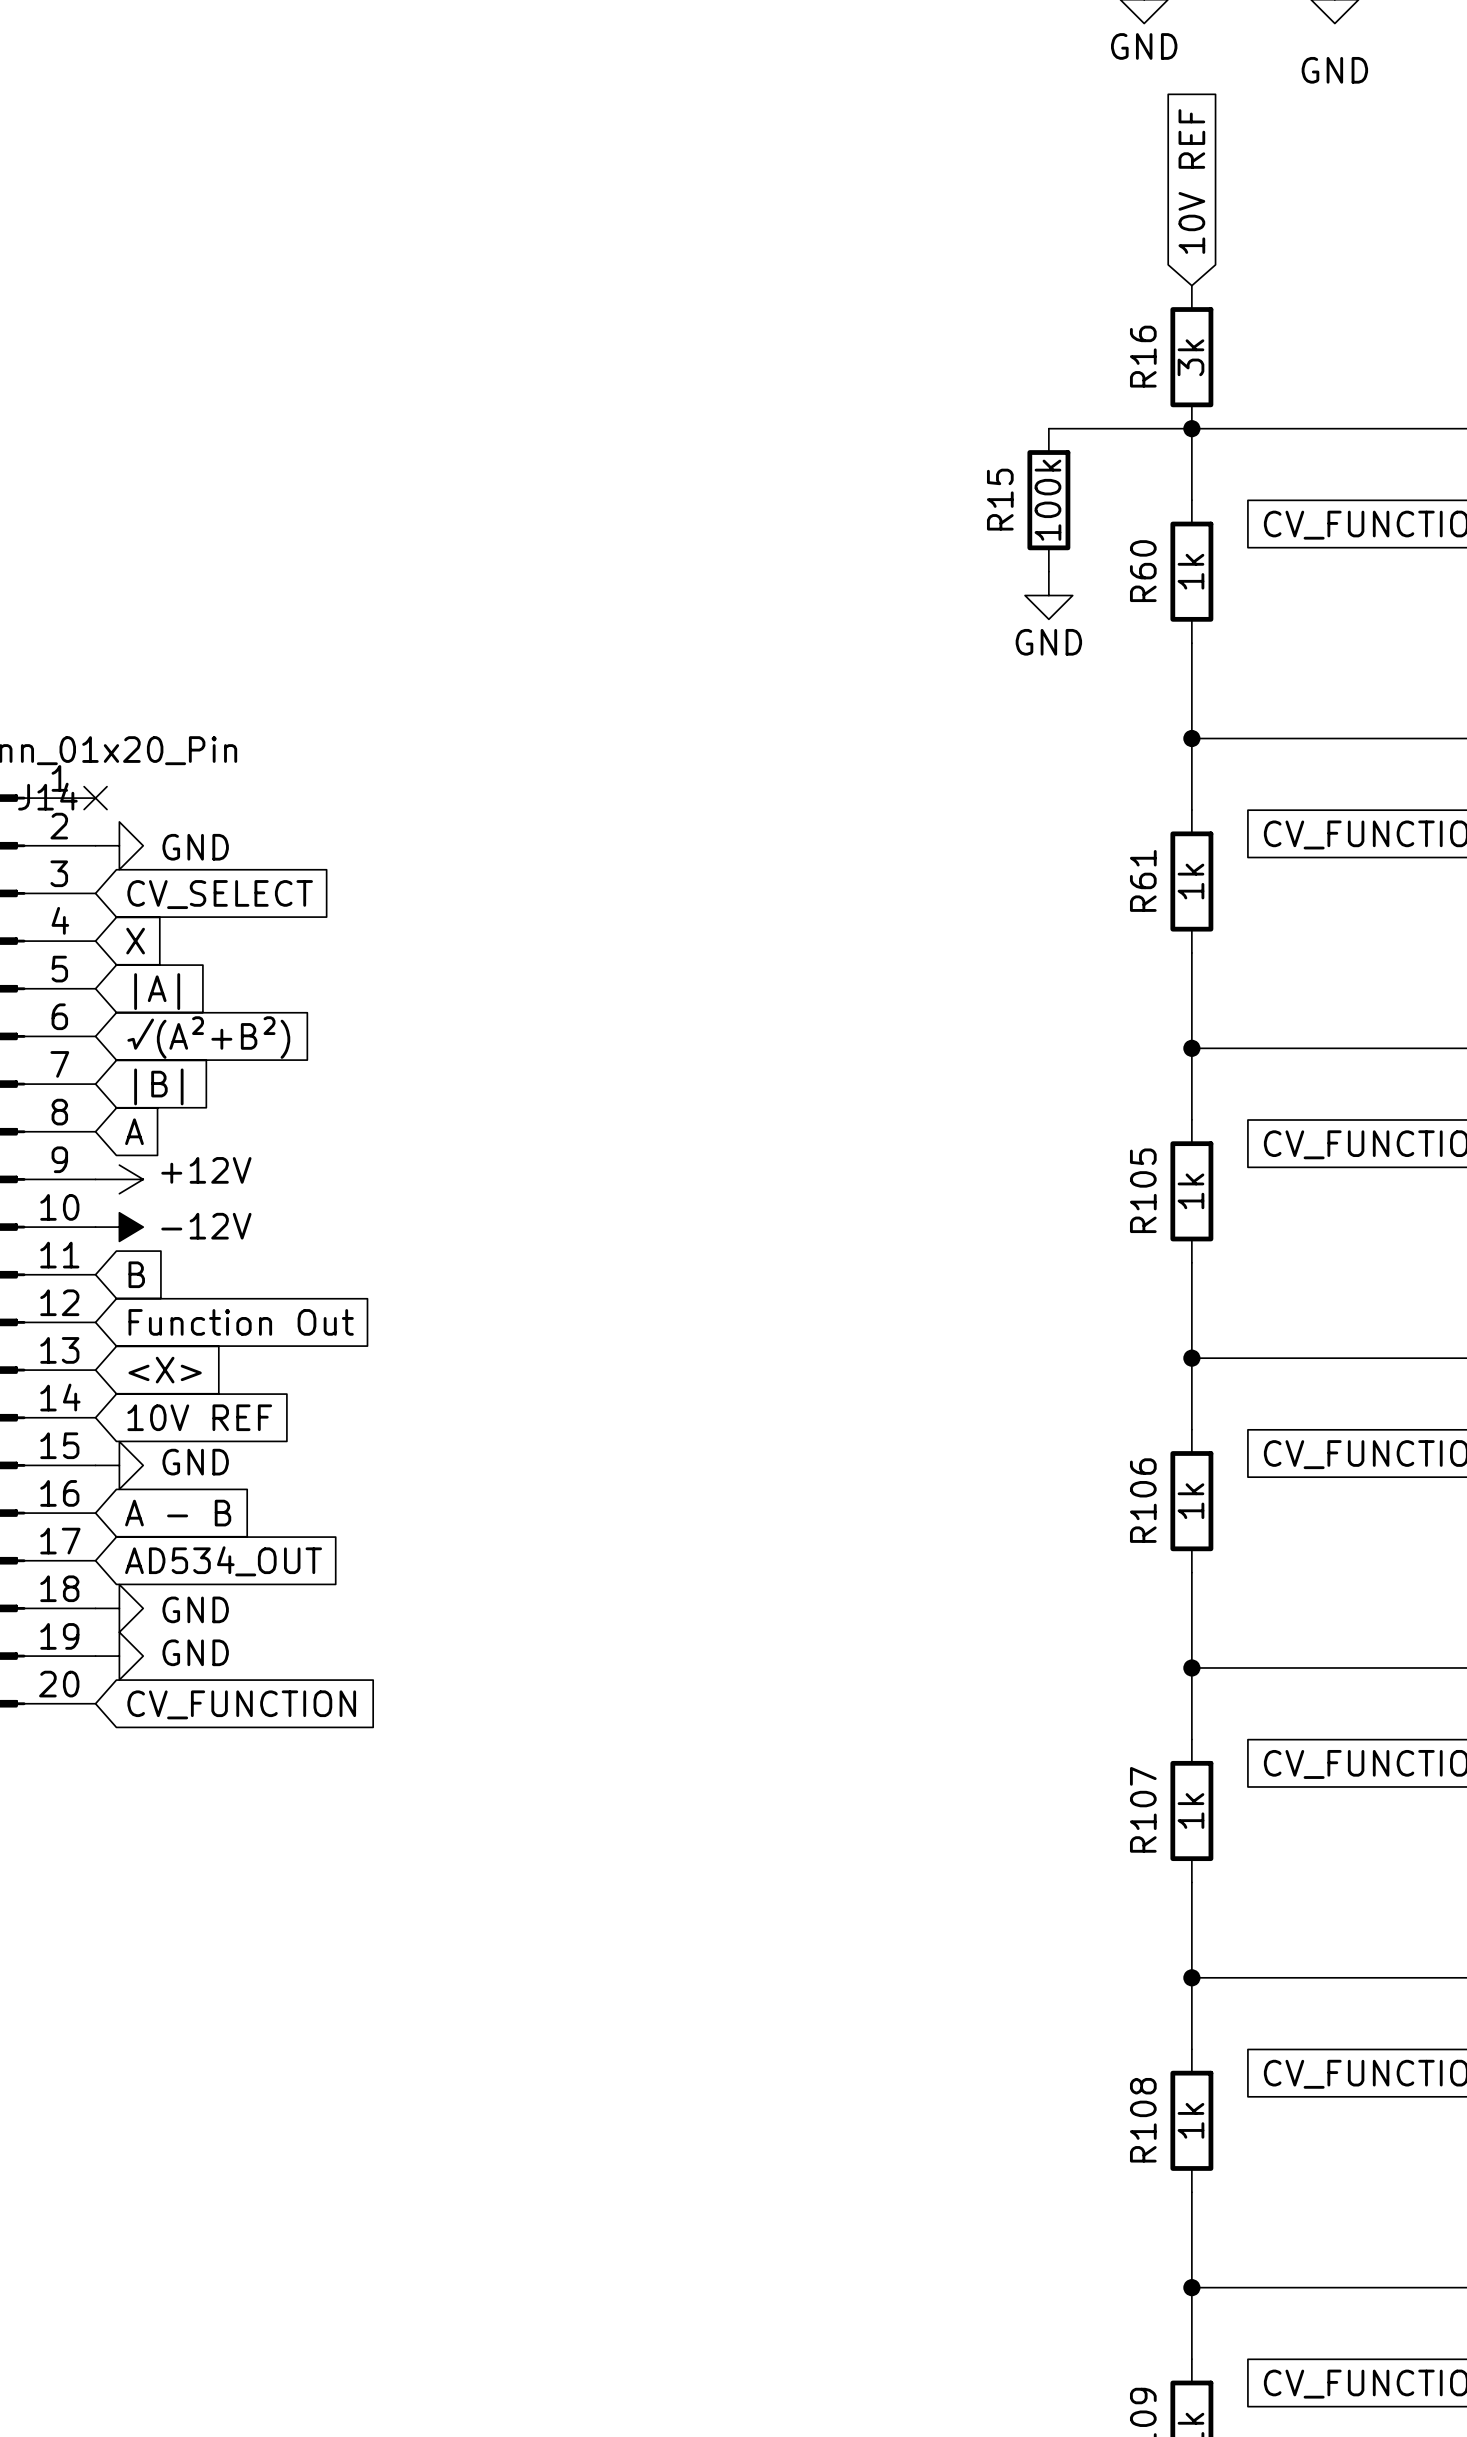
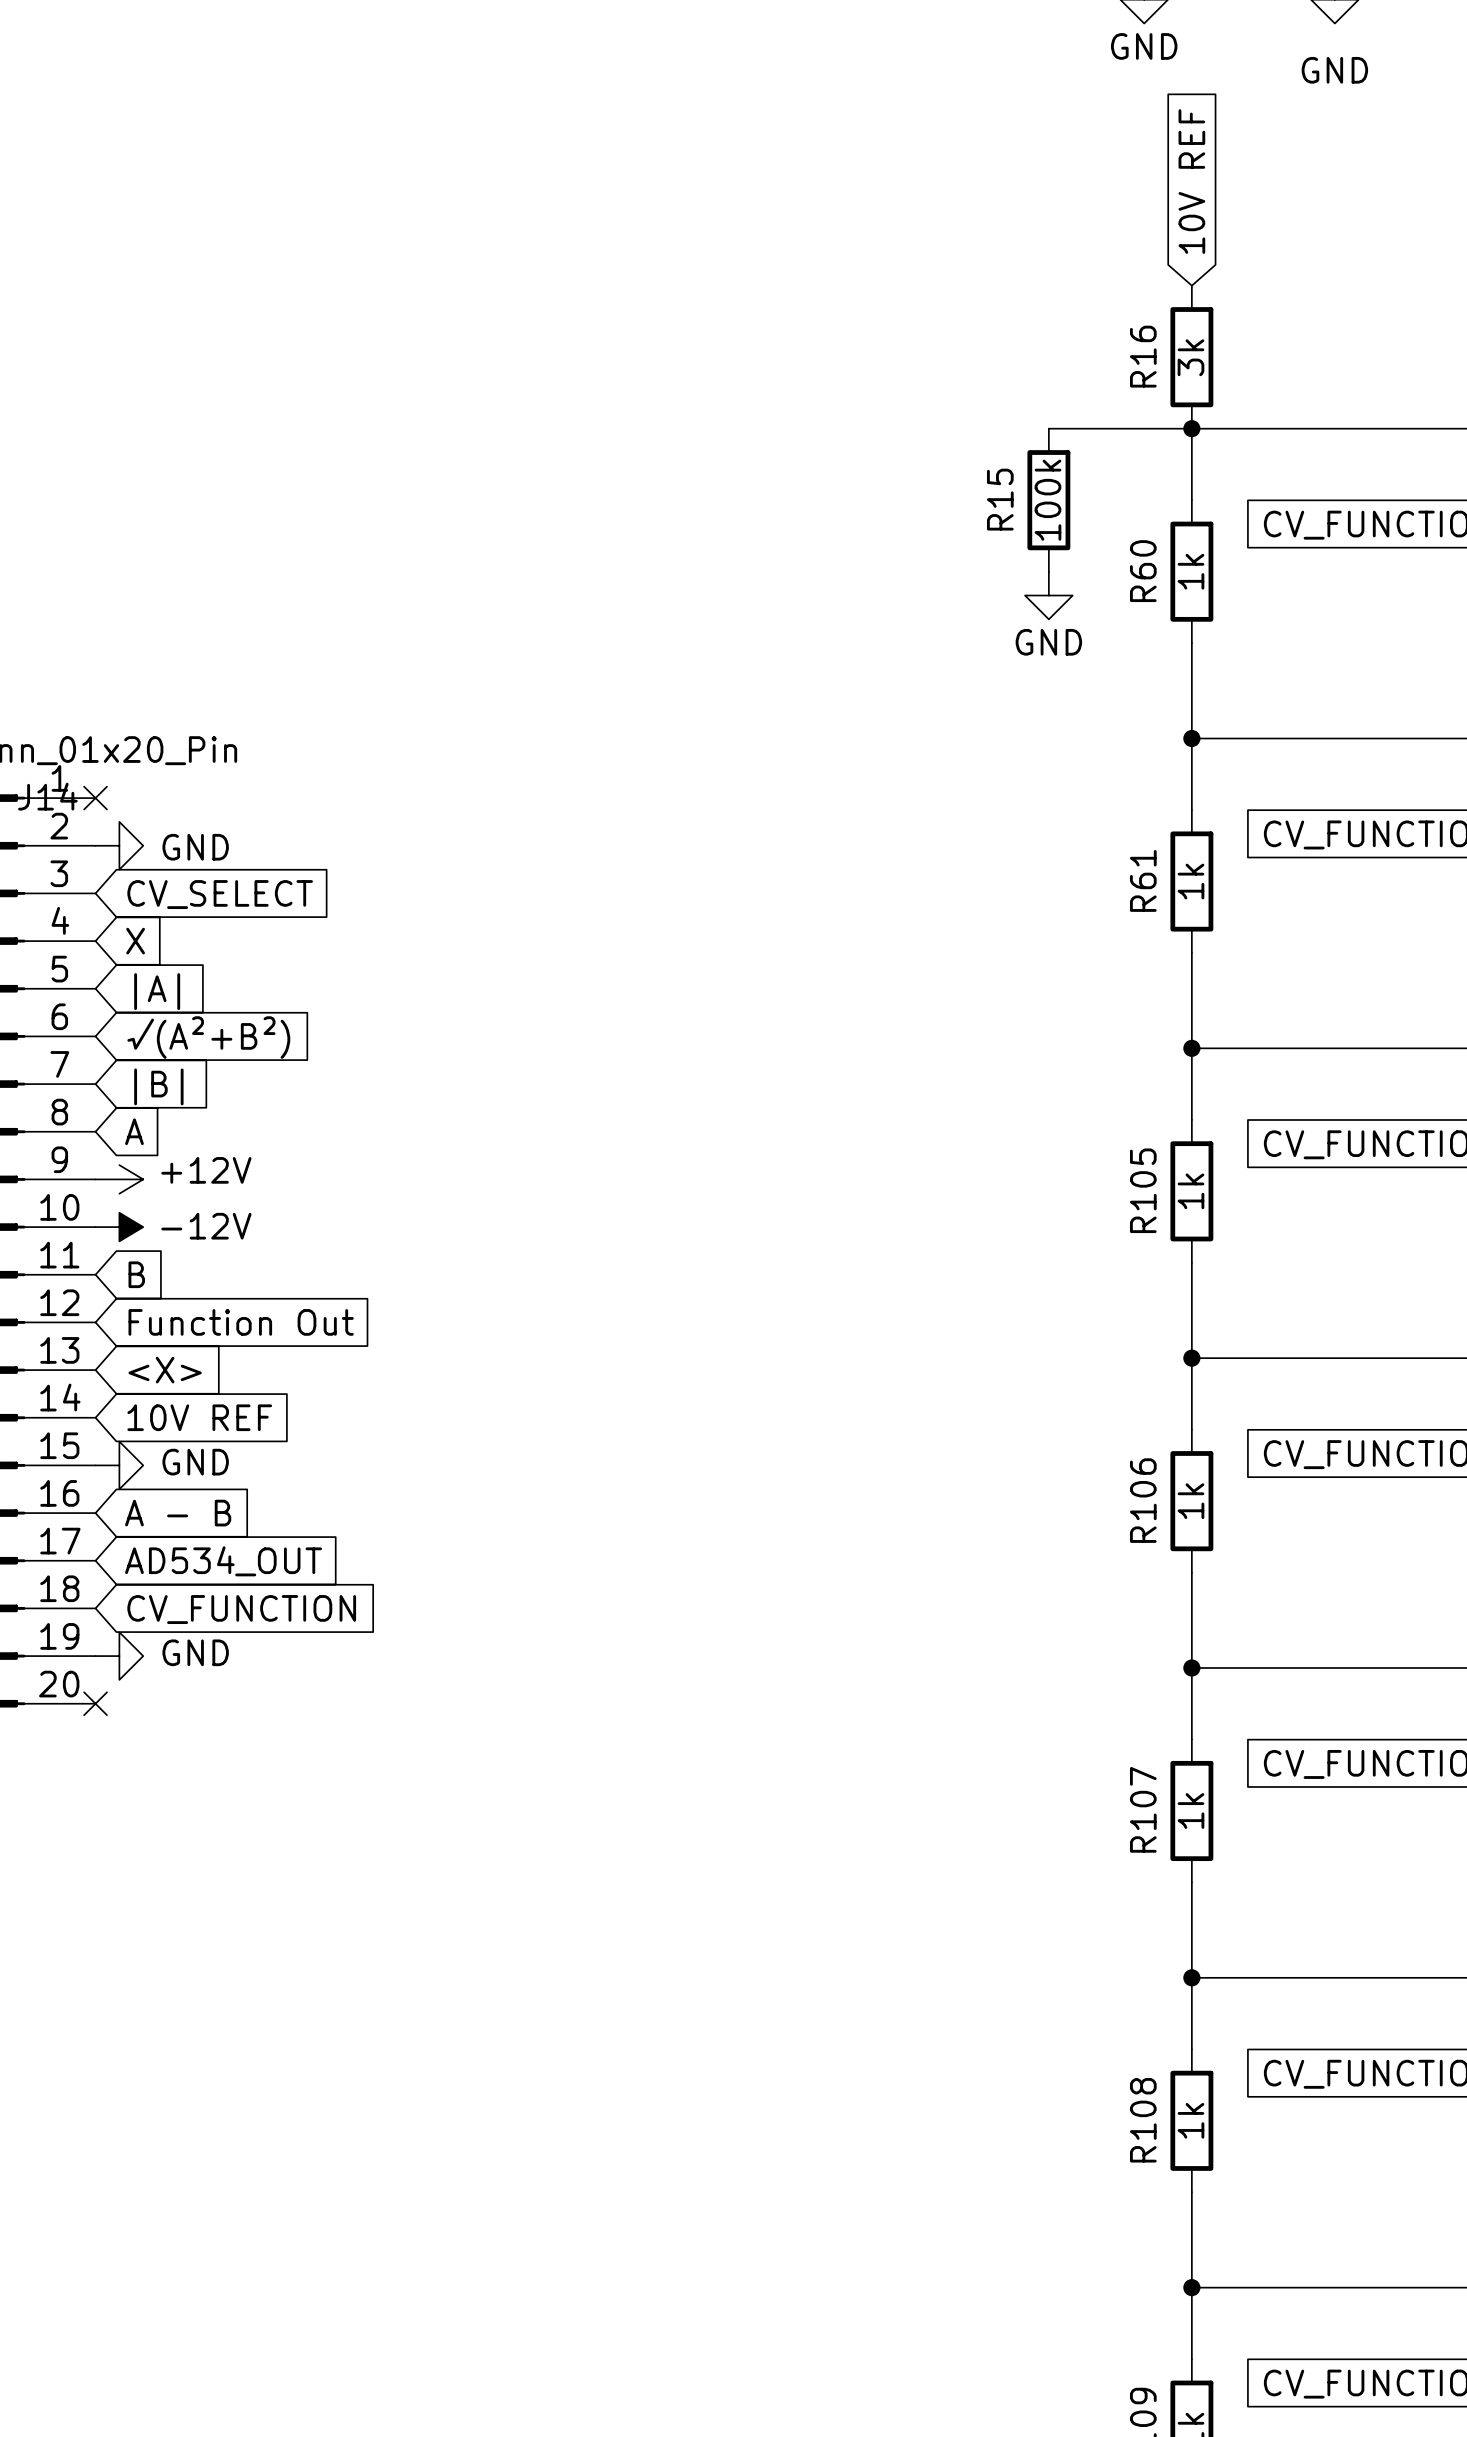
power symbol: GND (119, 1608) -> none
no-connect mark: none -> (95, 1703)
global label position: CV_FUNCTION (241, 1704) -> CV_FUNCTION (241, 1609)

